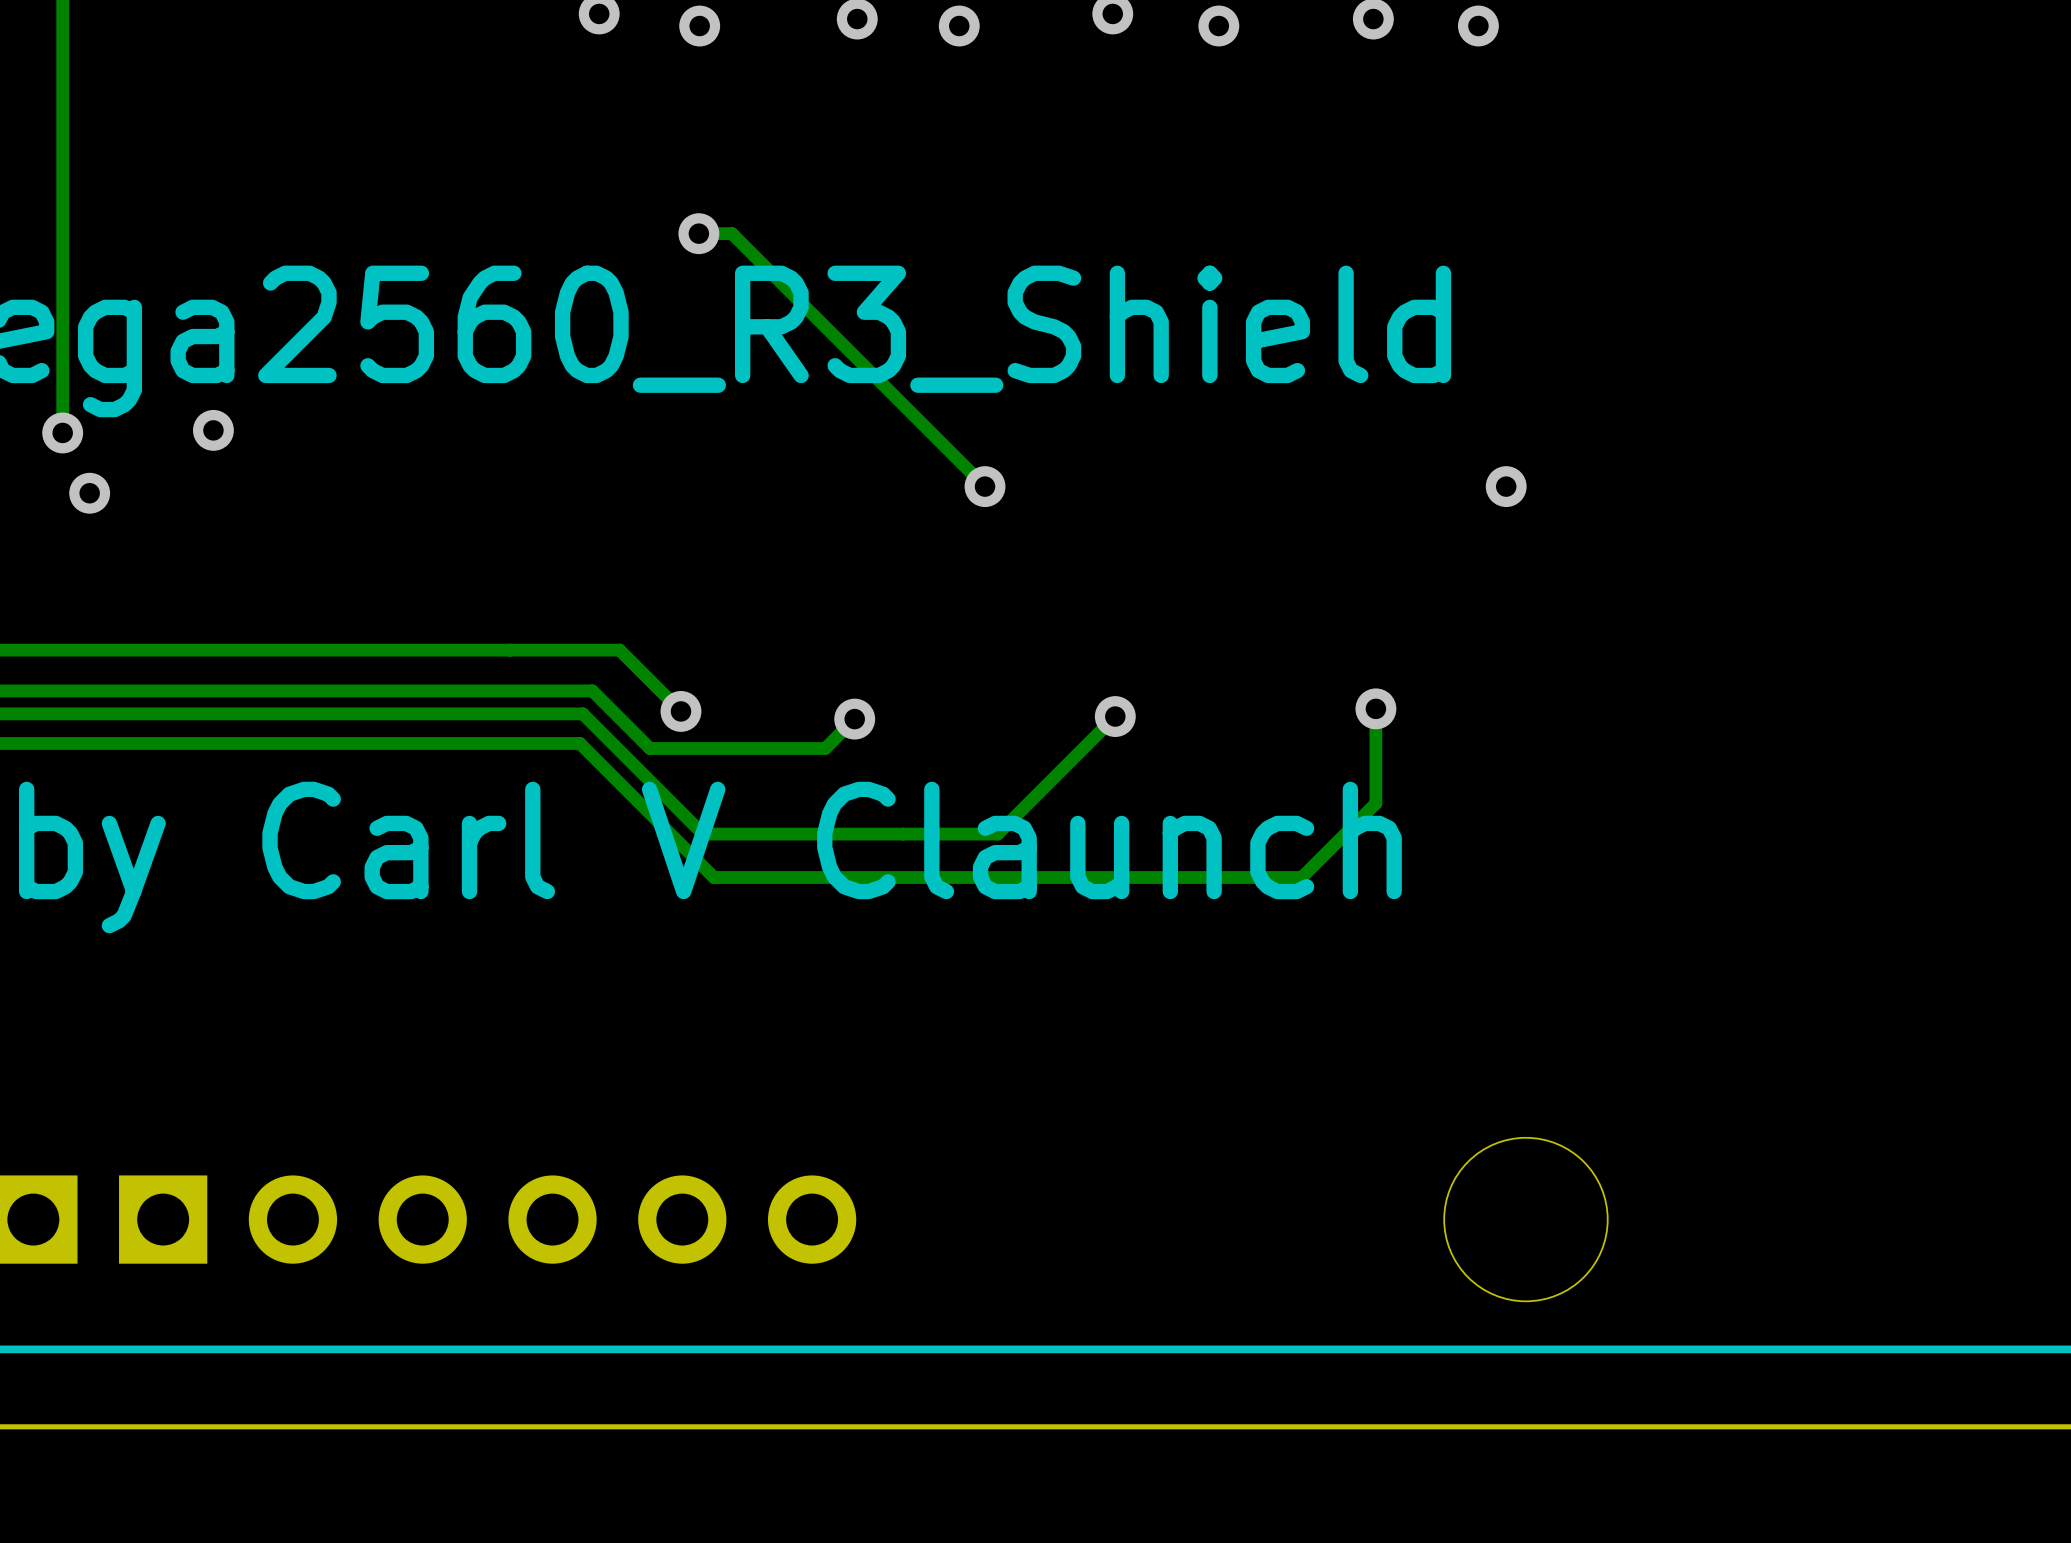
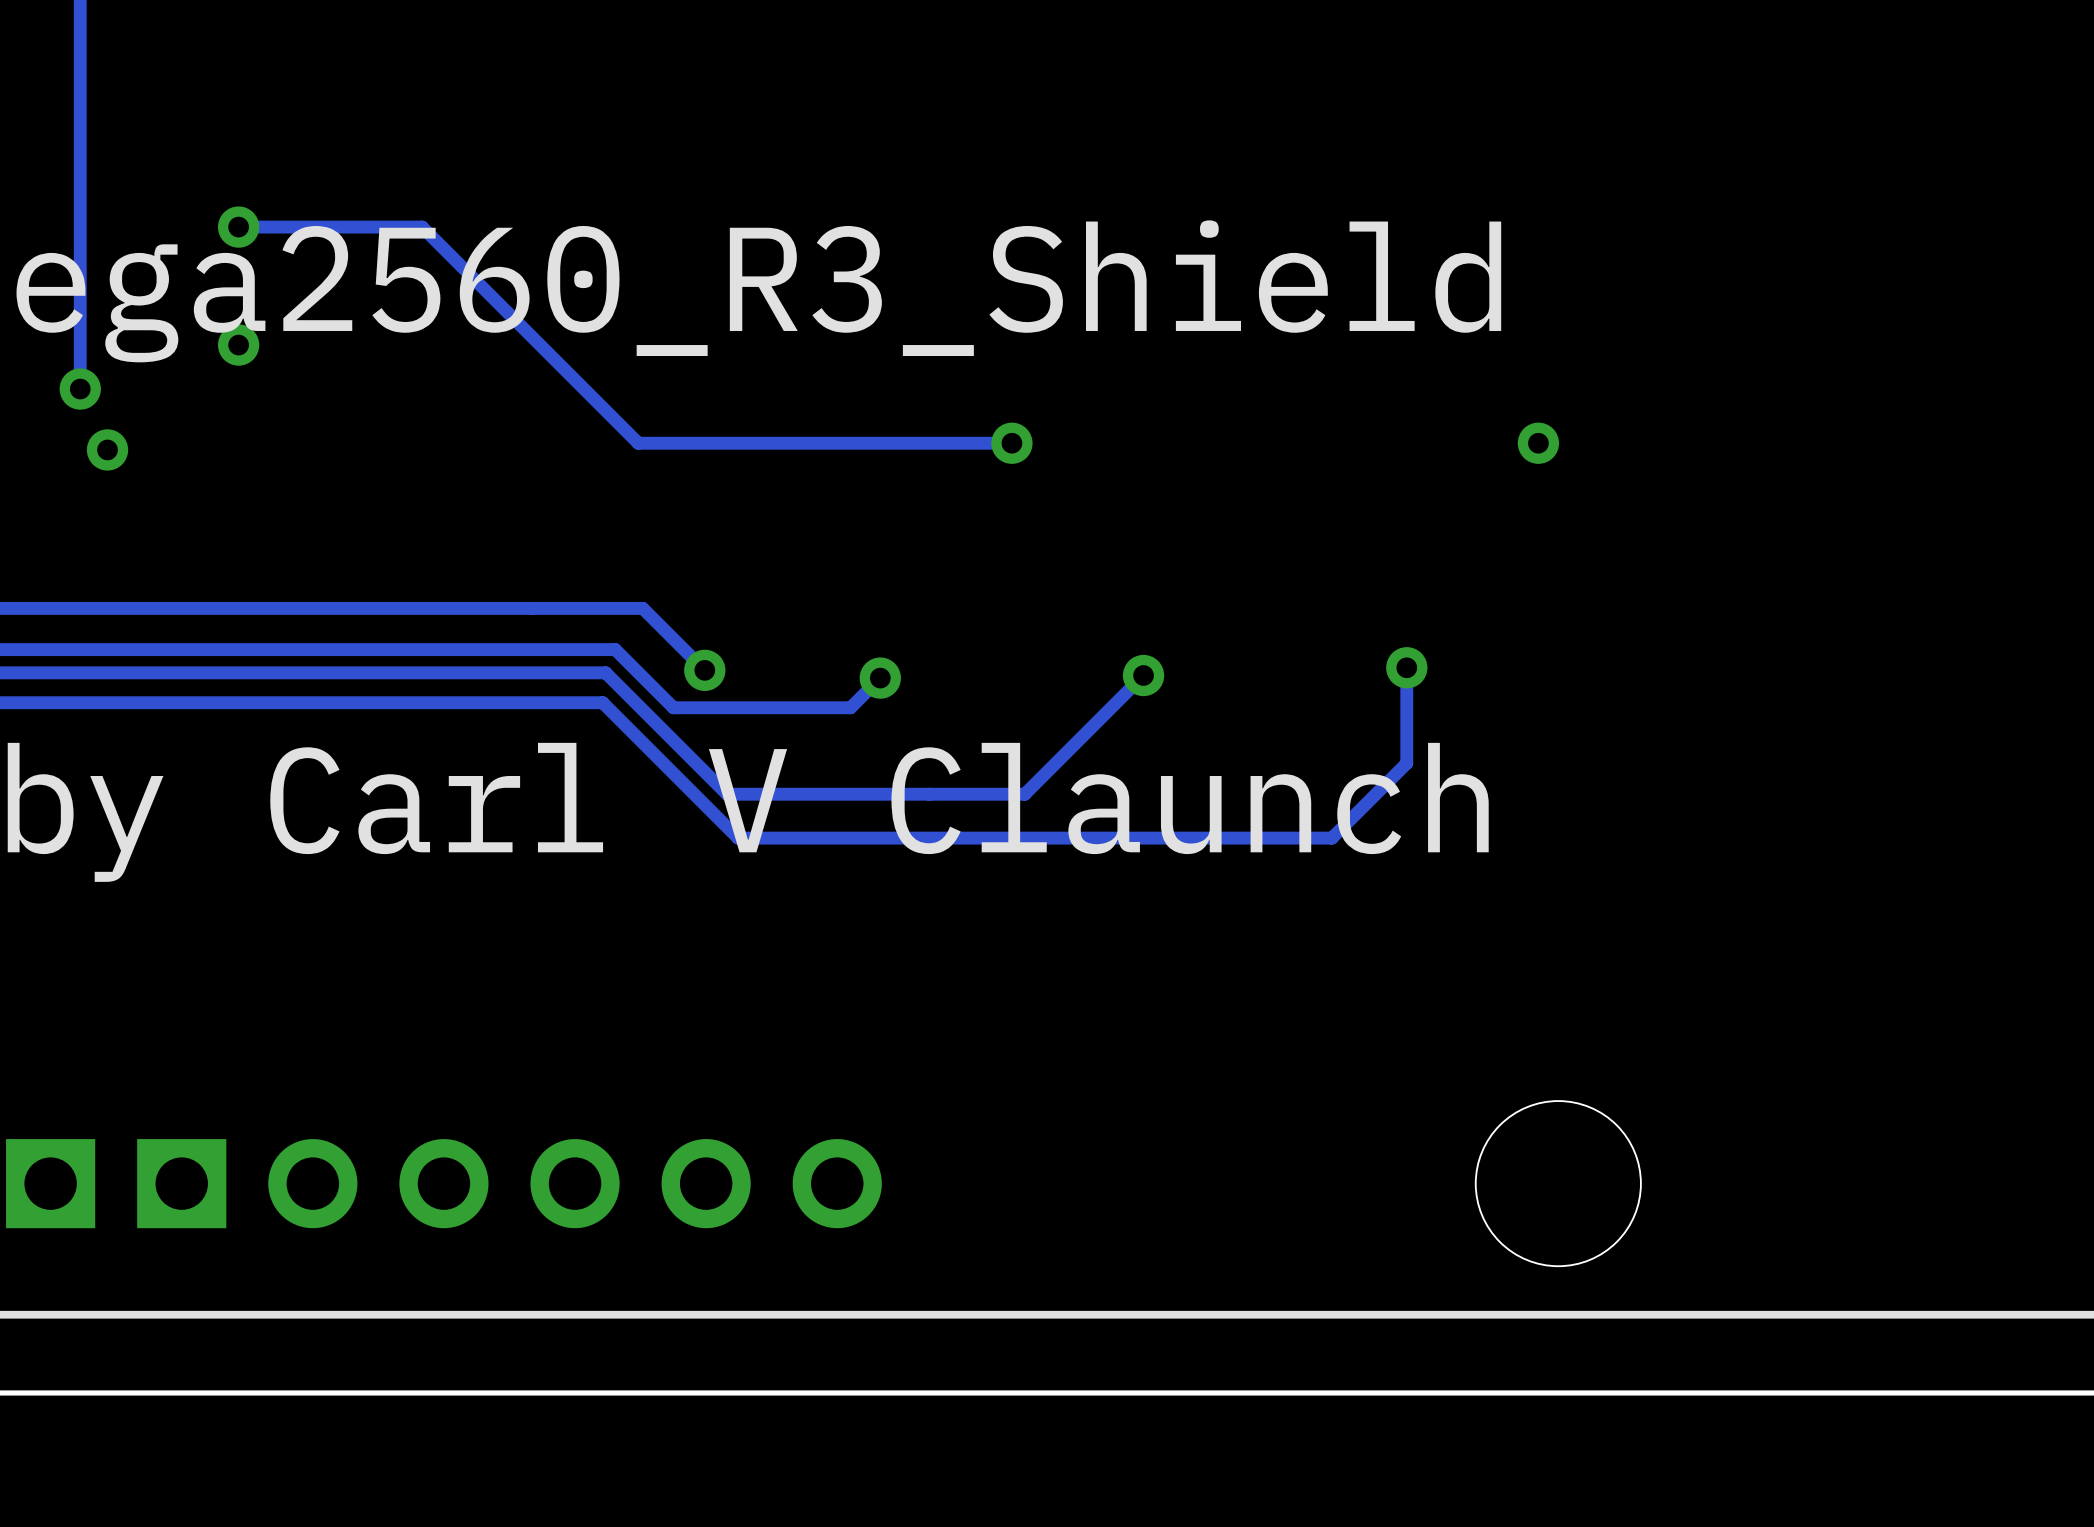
track: (698, 233) (732, 233) (985, 486) -> (238, 227) (422, 227) (638, 443) (1011, 443)
via: (698, 233) -> none
via: none -> (238, 227)
via position: (213, 430) -> (238, 345)

